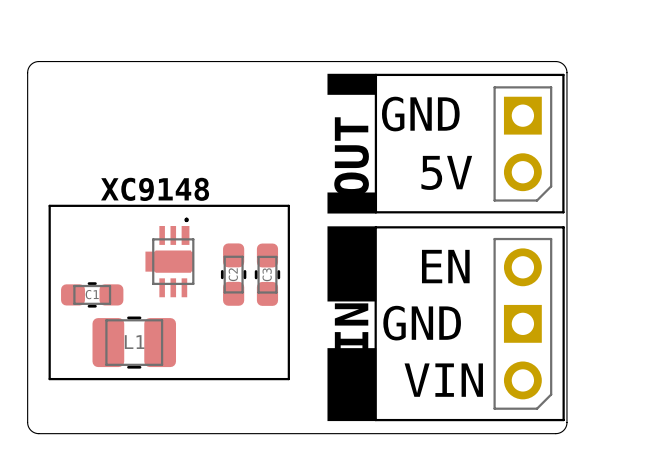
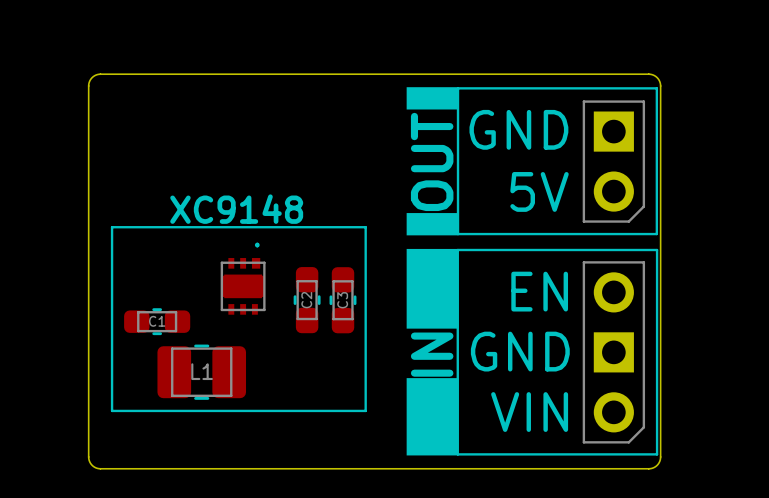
part footprint: [145, 217, 195, 298] -> [220, 242, 266, 315]

